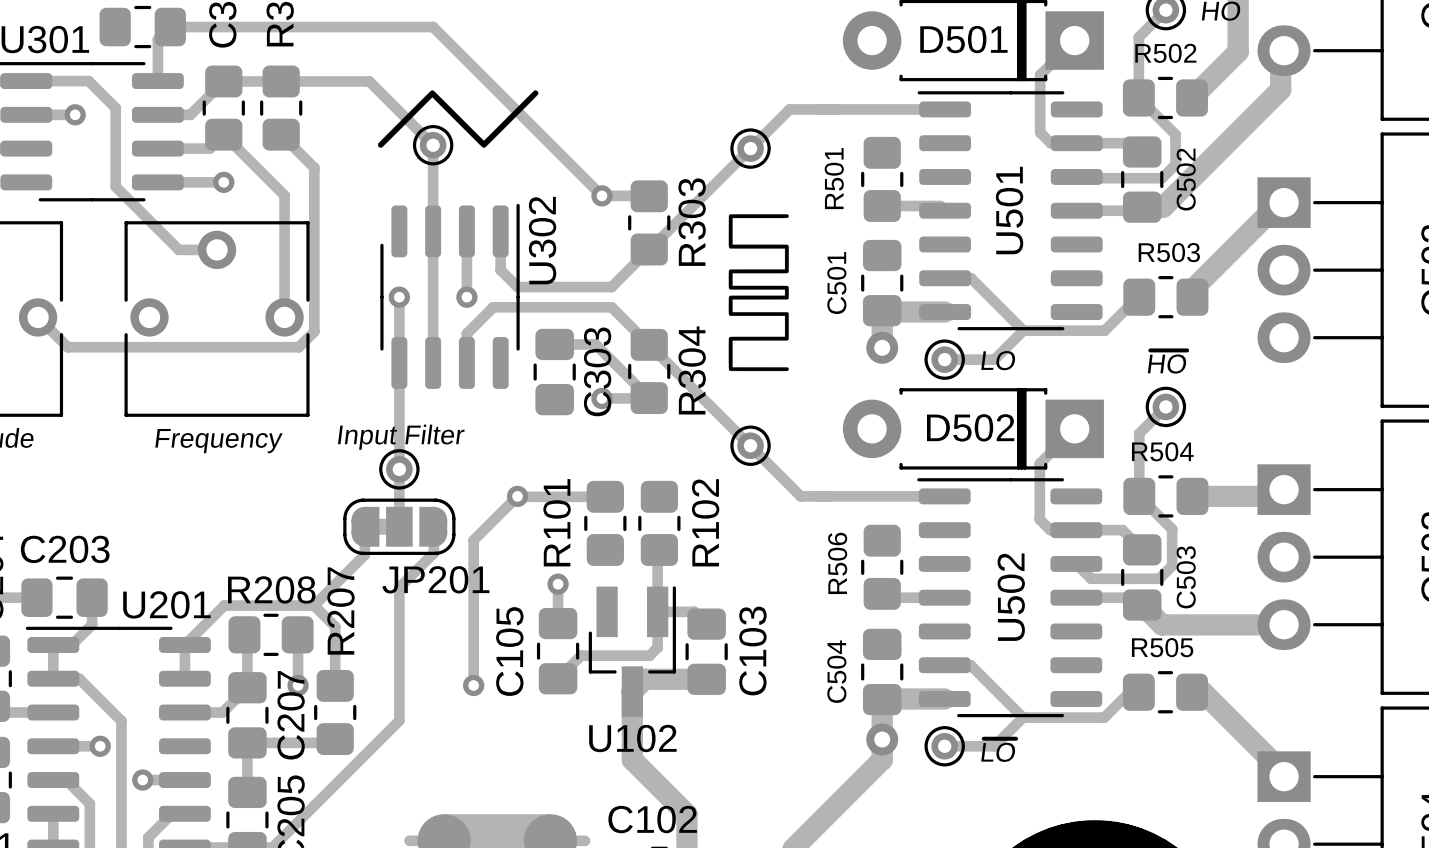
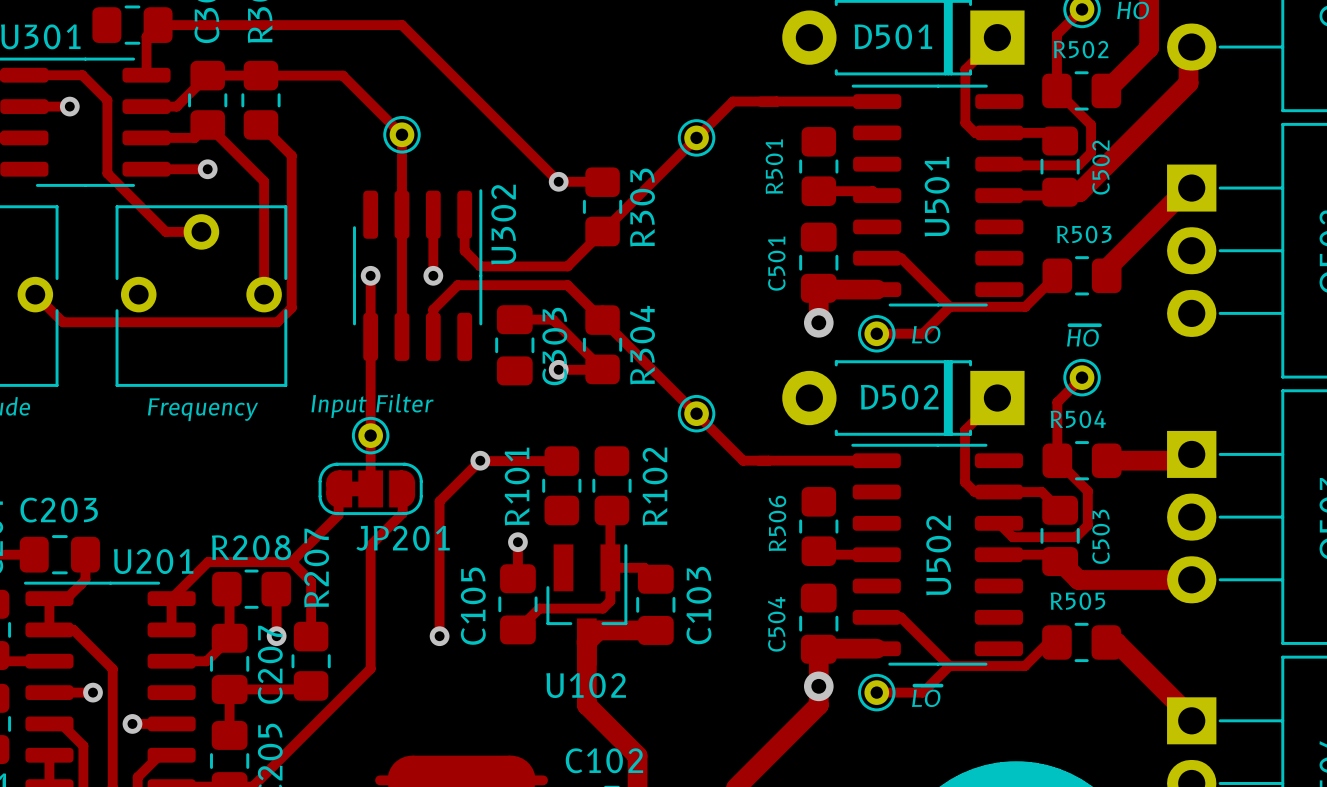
drawing: [377, 90, 539, 148] -> none
drawing: [728, 214, 789, 372] -> none

